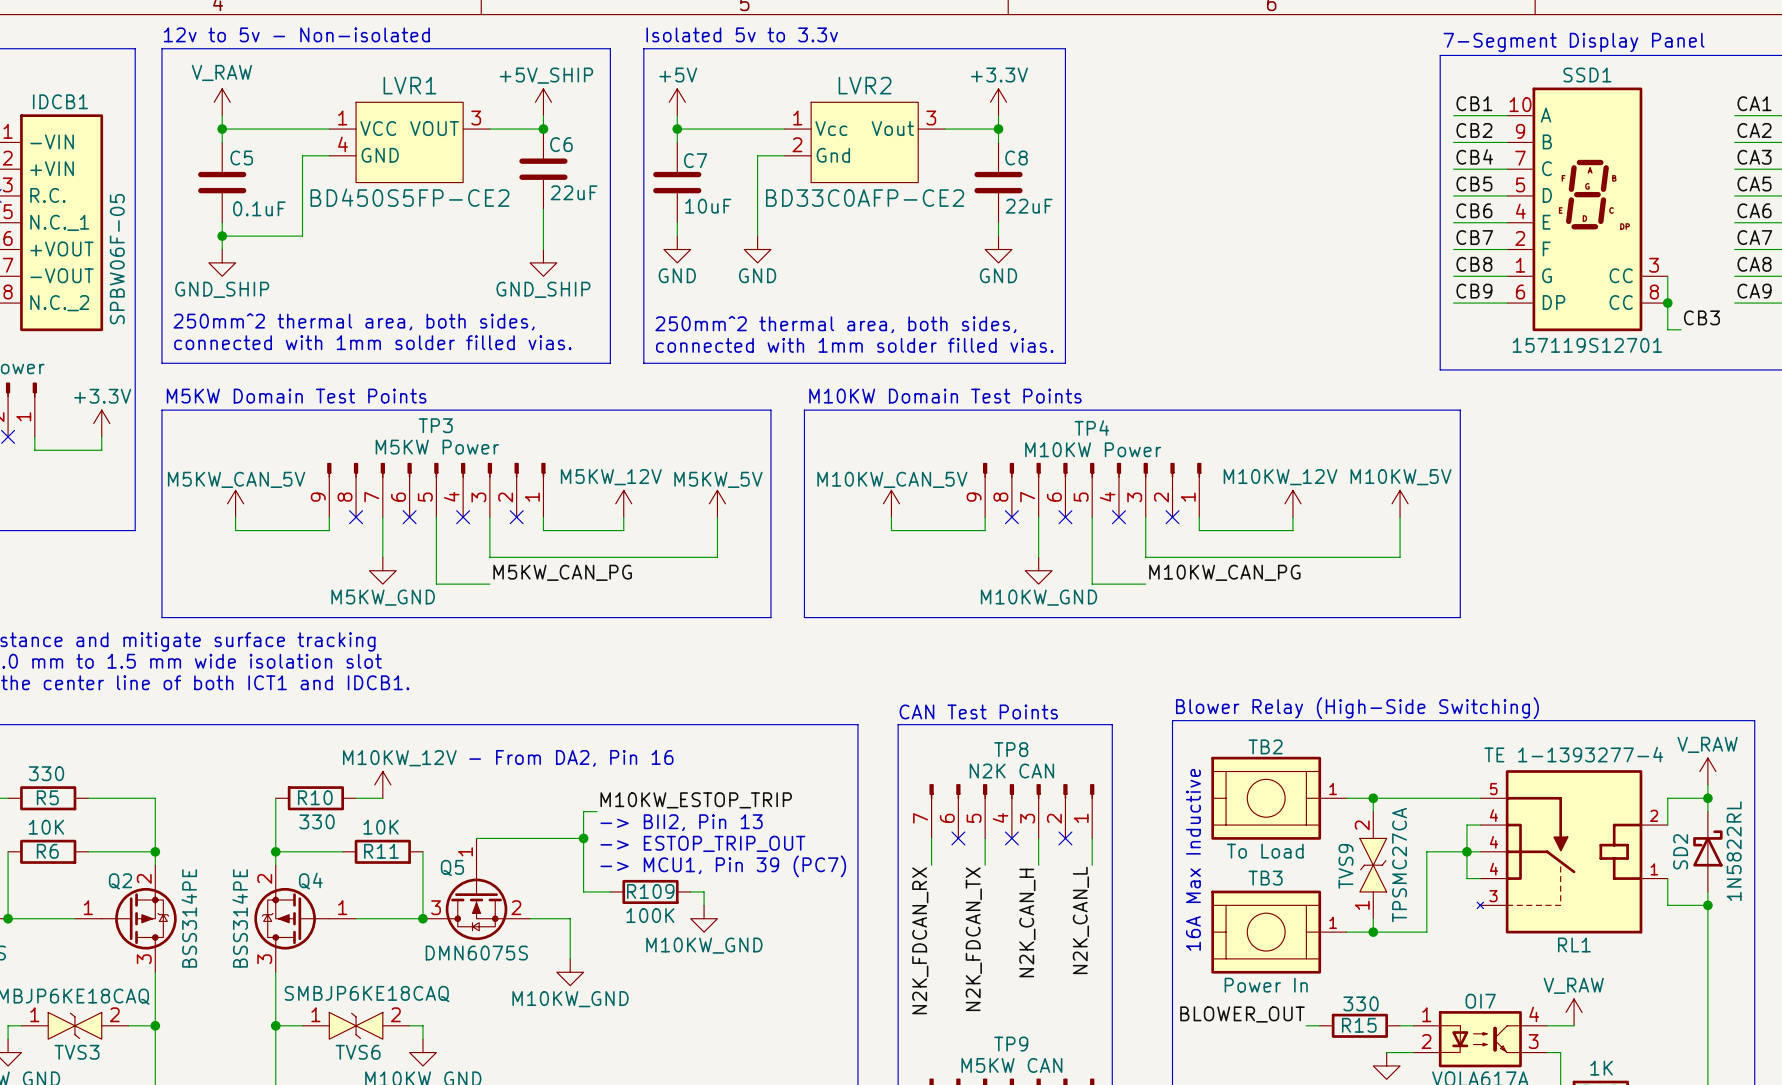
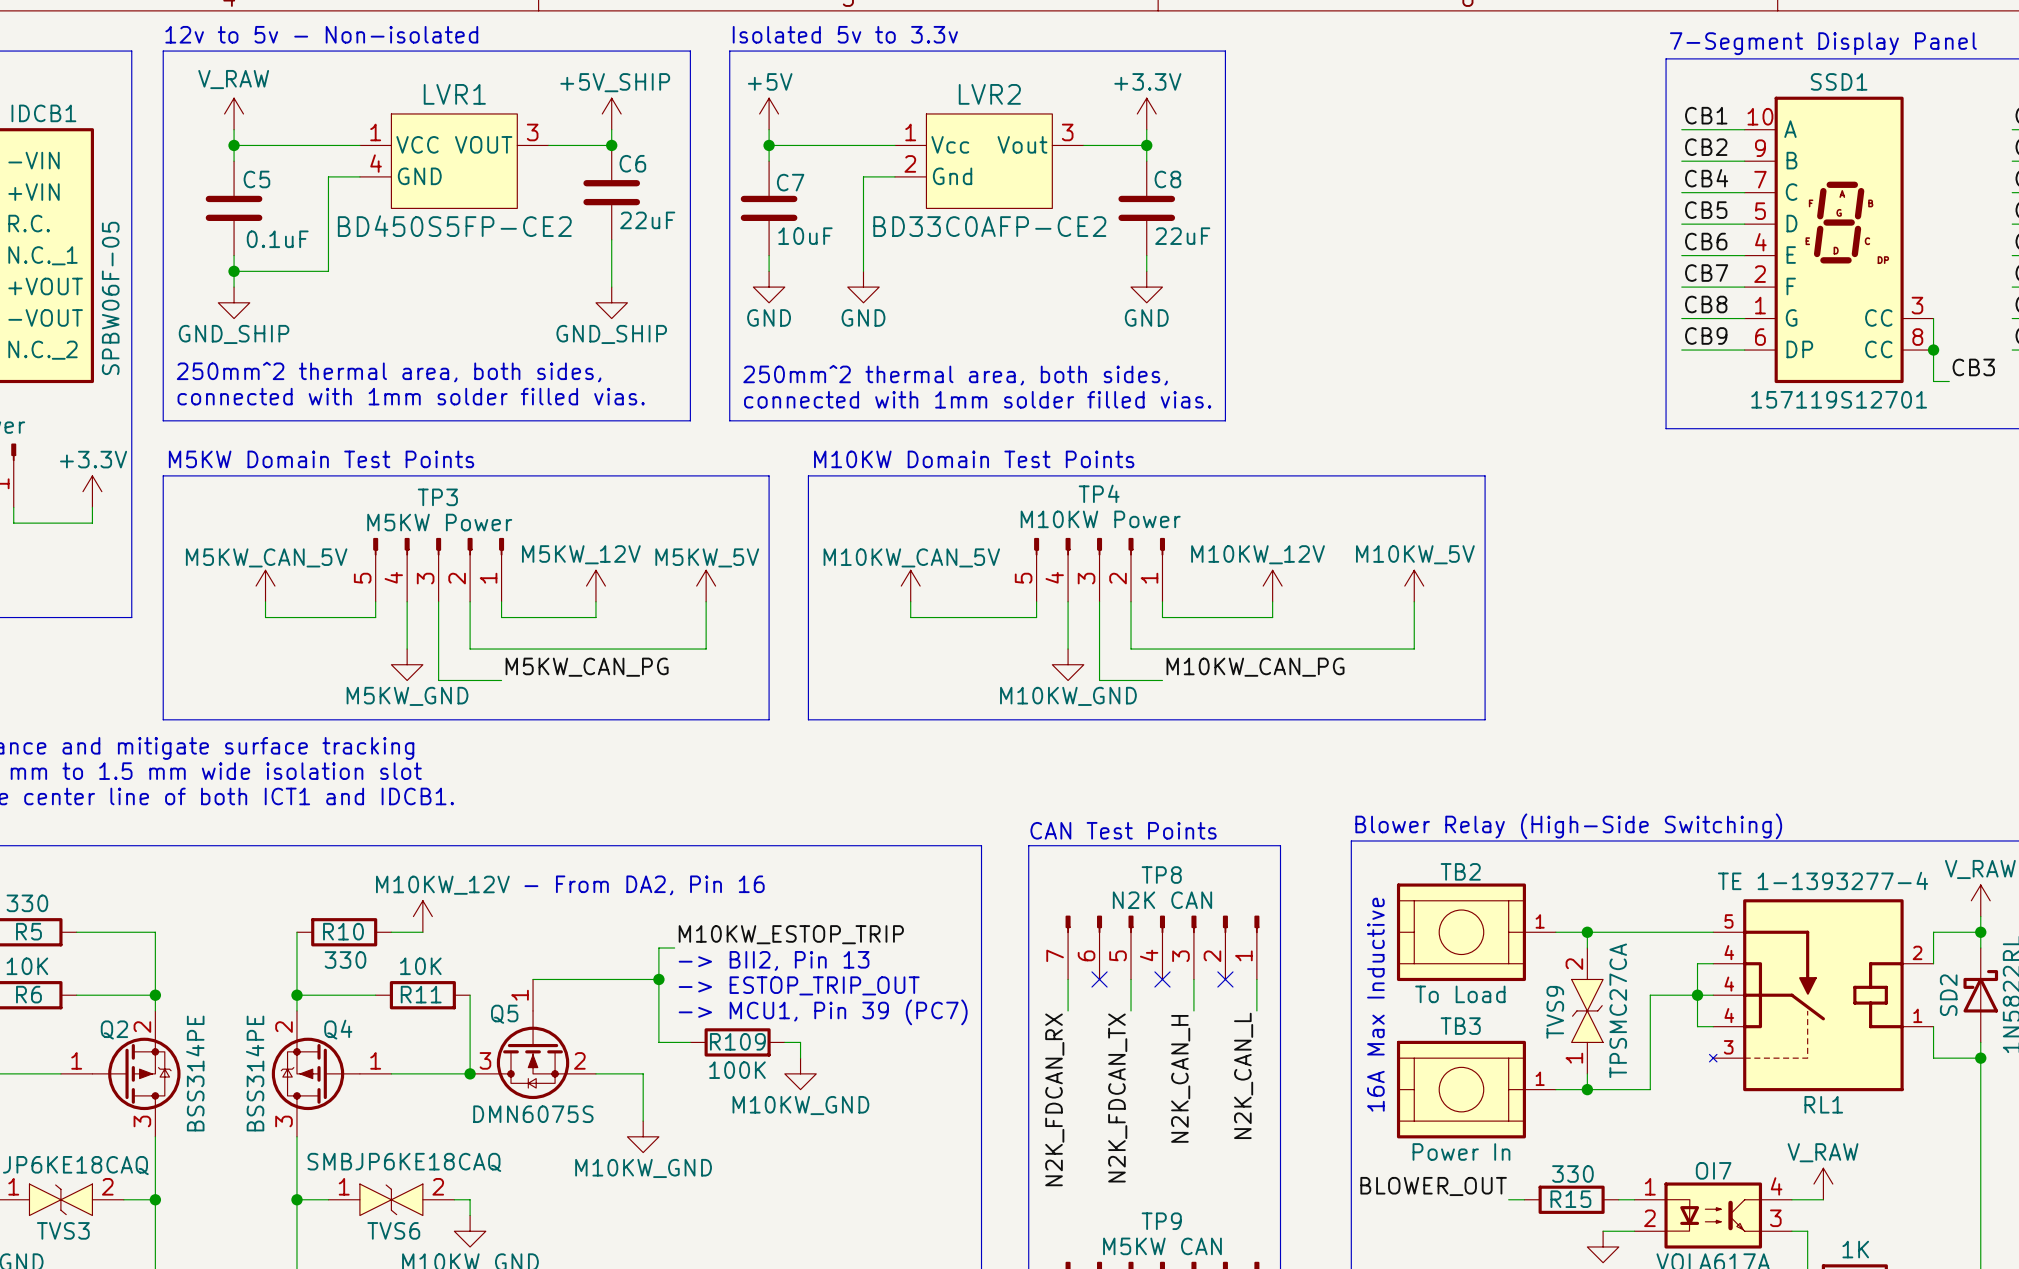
text position: M10KW Domain Test Points (945, 396) -> M10KW Domain Test Points (974, 459)
line: (677, 410) (710, 410) -> (769, 475) (769, 719)
line: (770, 410) (770, 617) -> (879, 475) (918, 475)
line: (804, 410) (804, 617) -> (879, 719) (918, 719)
line: (1286, 410) (1460, 410) (1460, 617) (1286, 617) -> (1485, 475) (1485, 719)
TP3 symbol: [327, 462, 546, 518] -> [373, 537, 505, 602]
TP4 symbol: [982, 462, 1202, 518] -> [1034, 537, 1165, 602]
power symbol position: M5KW_CAN_5V (235, 503) -> M5KW_CAN_5V (265, 586)
power symbol: none -> M5KW_12V (595, 586)
power symbol: M5KW_12V (623, 503) -> M5KW_5V (706, 586)
power symbol: M5KW_5V (717, 503) -> none
power symbol position: M10KW_CAN_5V (891, 503) -> M10KW_CAN_5V (910, 586)
power symbol position: M10KW_12V (1292, 503) -> M10KW_12V (1272, 586)
power symbol position: M10KW_5V (1400, 503) -> M10KW_5V (1414, 586)
wire: (235, 517) (235, 530) (248, 530) -> (265, 601) (265, 617)
wire: (329, 517) (329, 530) -> (375, 601) (375, 617) (359, 617)
no-connect mark: (356, 517) -> none
wire: (382, 517) (382, 557) -> (407, 601) (407, 649)
no-connect mark: (409, 517) -> none
wire: (436, 517) (436, 584) -> (438, 601) (438, 680) (485, 680)
wire: none -> (501, 601) (501, 617) (595, 617) (595, 601)
no-connect mark: (463, 517) -> none
wire: (489, 517) (489, 557) -> (470, 601) (470, 649) (548, 649)
no-connect mark: (516, 517) -> none
wire: (543, 517) (543, 530) (623, 530) -> (706, 649) (706, 617)
wire: (717, 517) (717, 557) (623, 557) -> none
wire: (891, 517) (891, 530) -> (910, 601) (910, 617) (1020, 617)
no-connect mark: (1011, 517) -> none
wire: (1038, 517) (1038, 557) -> (1068, 601) (1068, 649)
no-connect mark: (1065, 517) -> none
wire: (1092, 517) (1092, 584) (1145, 584) -> (1099, 601) (1099, 680) (1162, 680)
no-connect mark: (1118, 517) -> none
wire: (1145, 517) (1145, 557) -> (1131, 617) (1131, 649) (1319, 649)
no-connect mark: (1172, 517) -> none
wire: (1199, 517) (1199, 530) (1292, 530) (1292, 517) -> (1162, 601) (1162, 617) (1272, 617) (1272, 601)
wire: (1400, 517) (1400, 557) (1226, 557) -> (1414, 601) (1414, 649)
wire: (904, 530) (985, 530) -> (1036, 617) (1036, 601)
power symbol position: M5KW_GND (382, 570) -> M5KW_GND (407, 664)
power symbol position: M10KW_GND (1038, 570) -> M10KW_GND (1068, 664)
label position: M5KW_CAN_PG (562, 572) -> M5KW_CAN_PG (587, 667)
label position: M10KW_CAN_PG (1224, 572) -> M10KW_CAN_PG (1255, 667)
wire: (449, 584) (489, 584) -> none
line: (677, 617) (710, 617) -> (808, 475) (808, 719)

